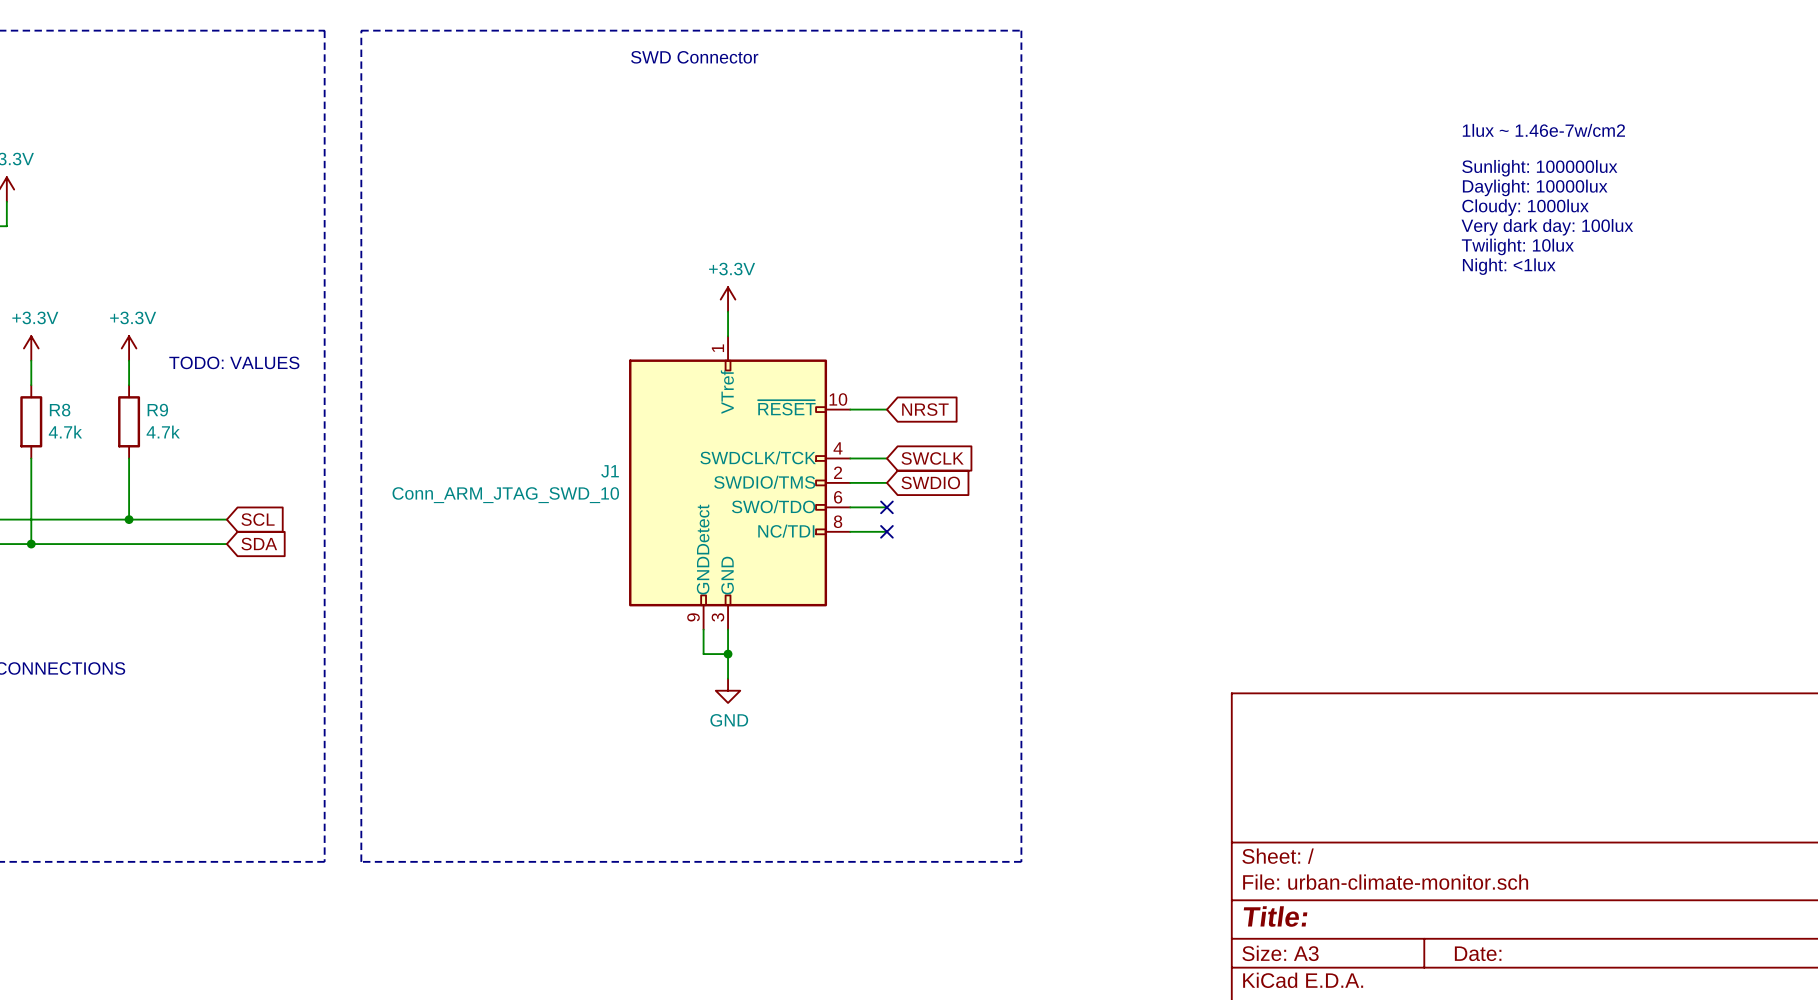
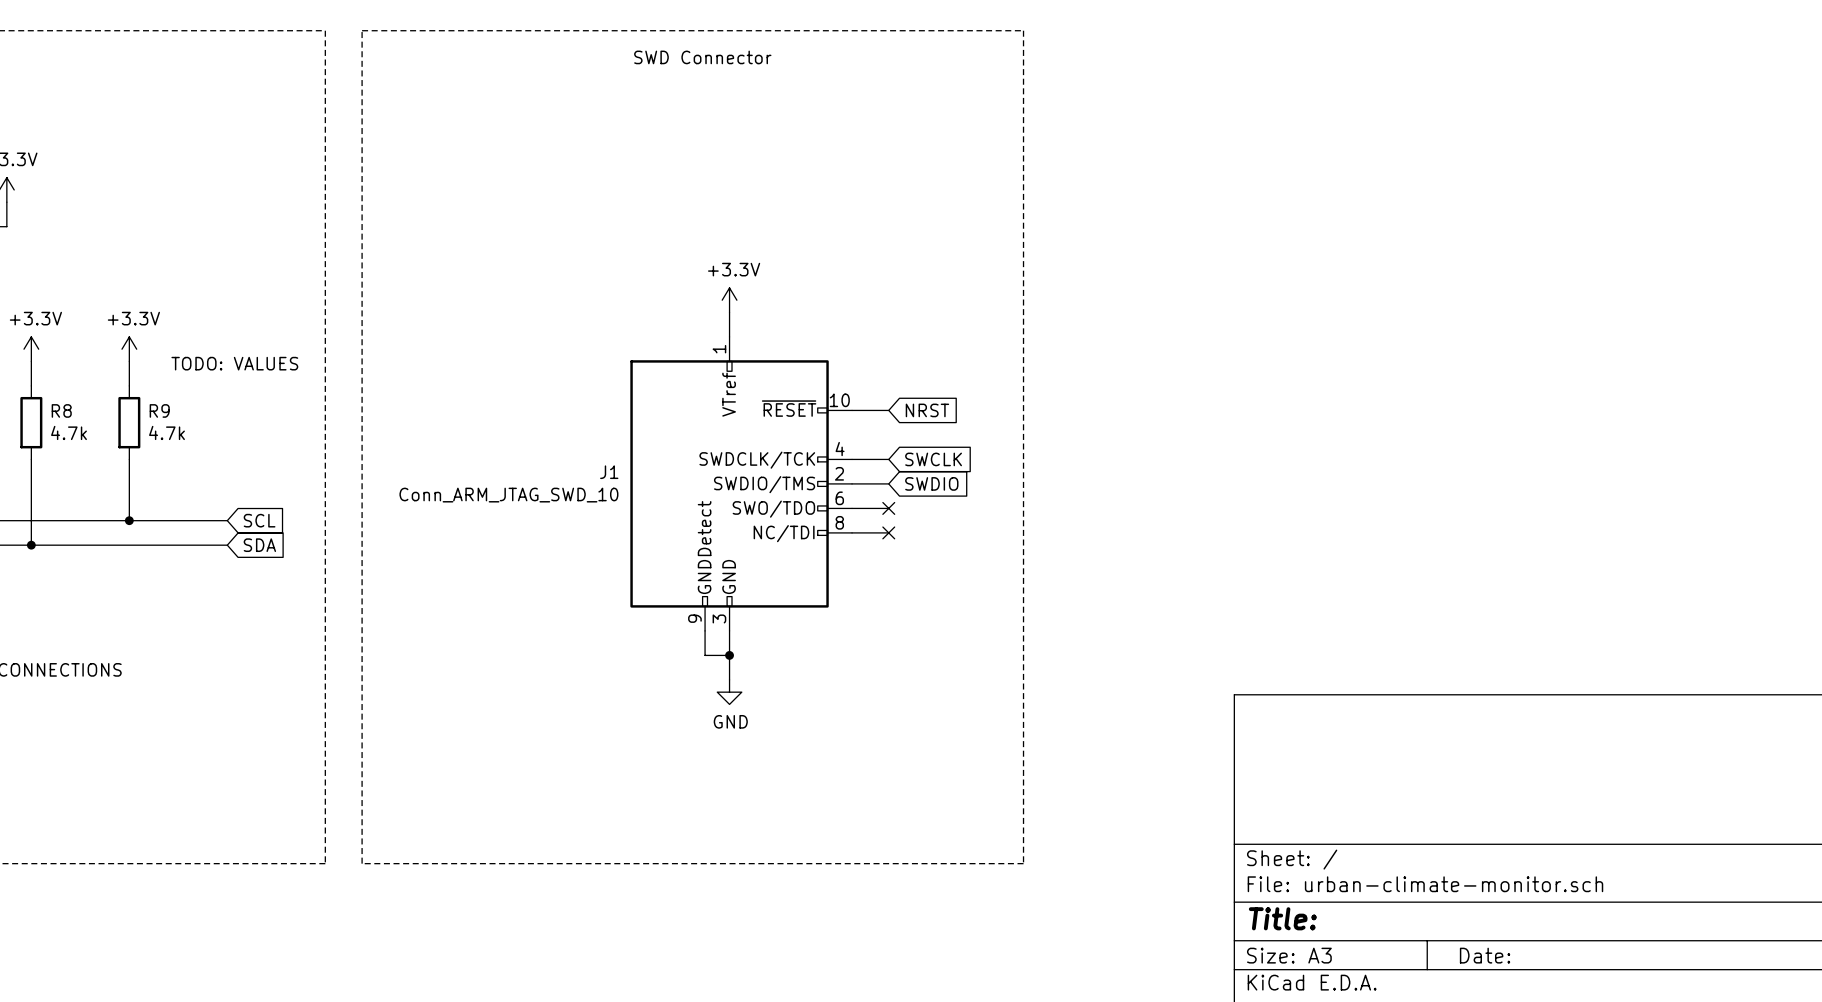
text: 1lux ~ 1.46e-7w/cm2 (1543, 130) -> none
text: Sunlight: 100000lux (1539, 168) -> none
text: Daylight: 10000lux (1535, 187) -> none
text: Cloudy: 1000lux (1525, 207) -> none
text: Very dark day: 100lux (1547, 227) -> none
text: Twilight: 10lux (1517, 246) -> none
text: Night: <1lux (1509, 266) -> none

